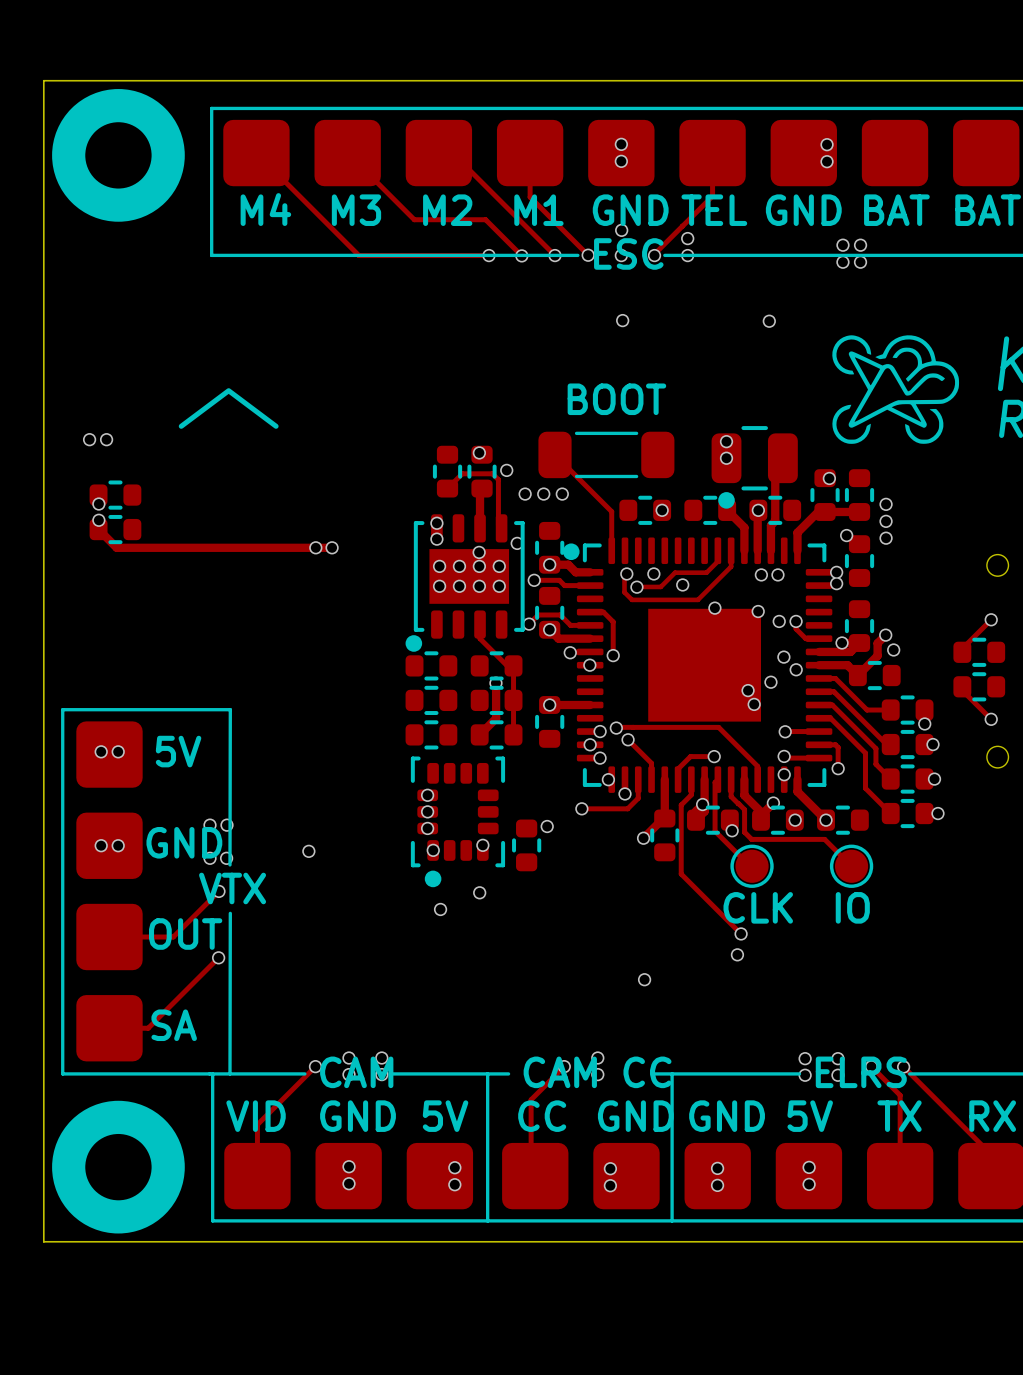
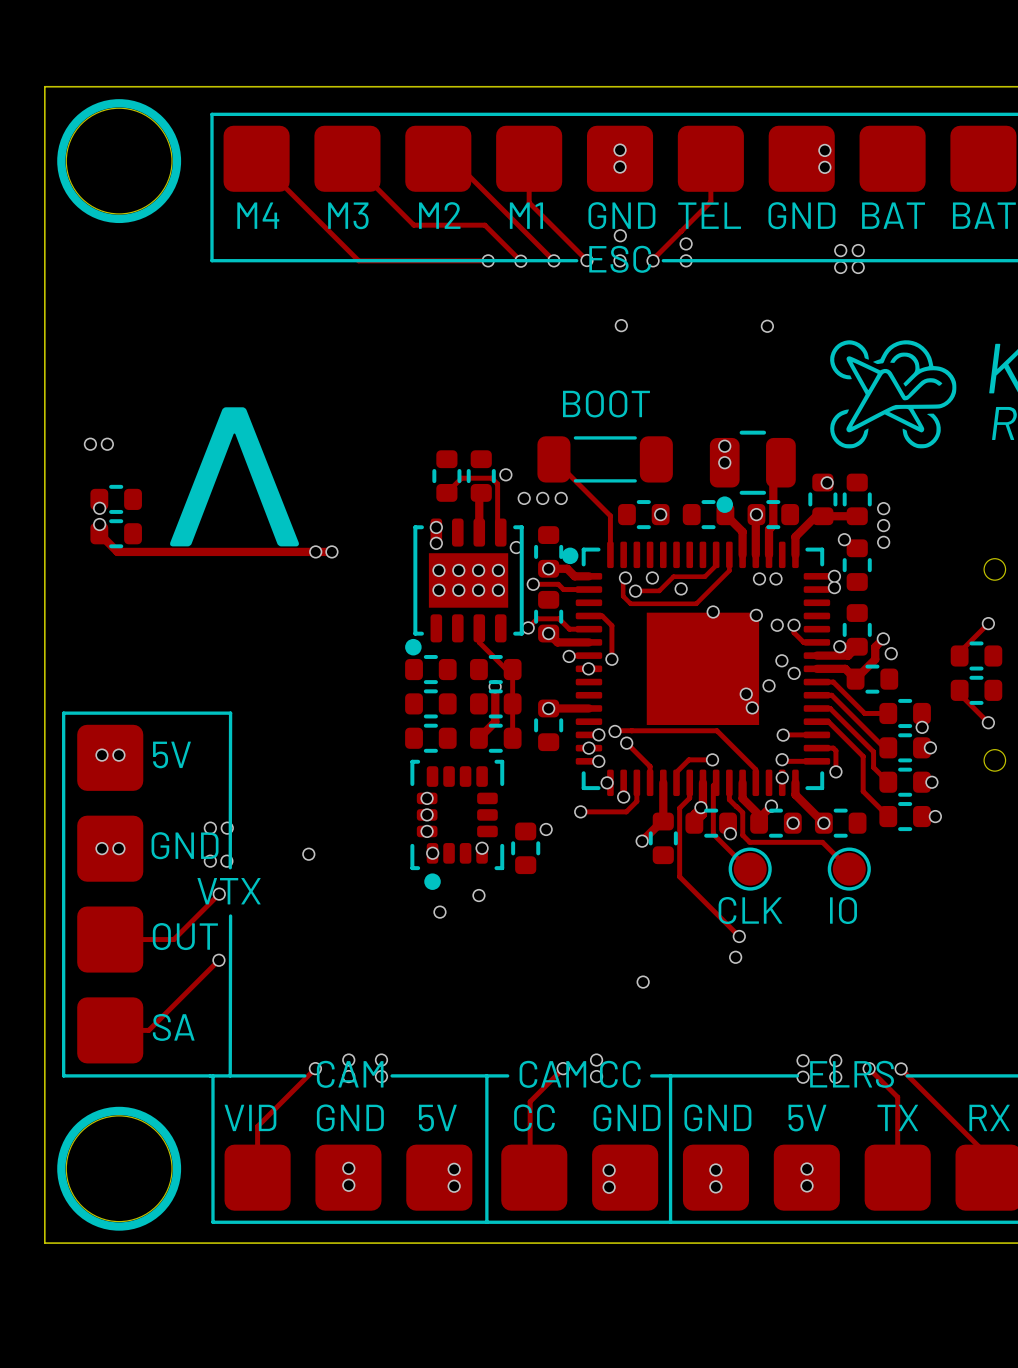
drawing shape: [52, 89, 185, 222] -> [57, 99, 182, 224]
via: (479, 452) -> none
via: (479, 552) -> none
drawing shape: [52, 1100, 185, 1234] -> [57, 1106, 182, 1231]

